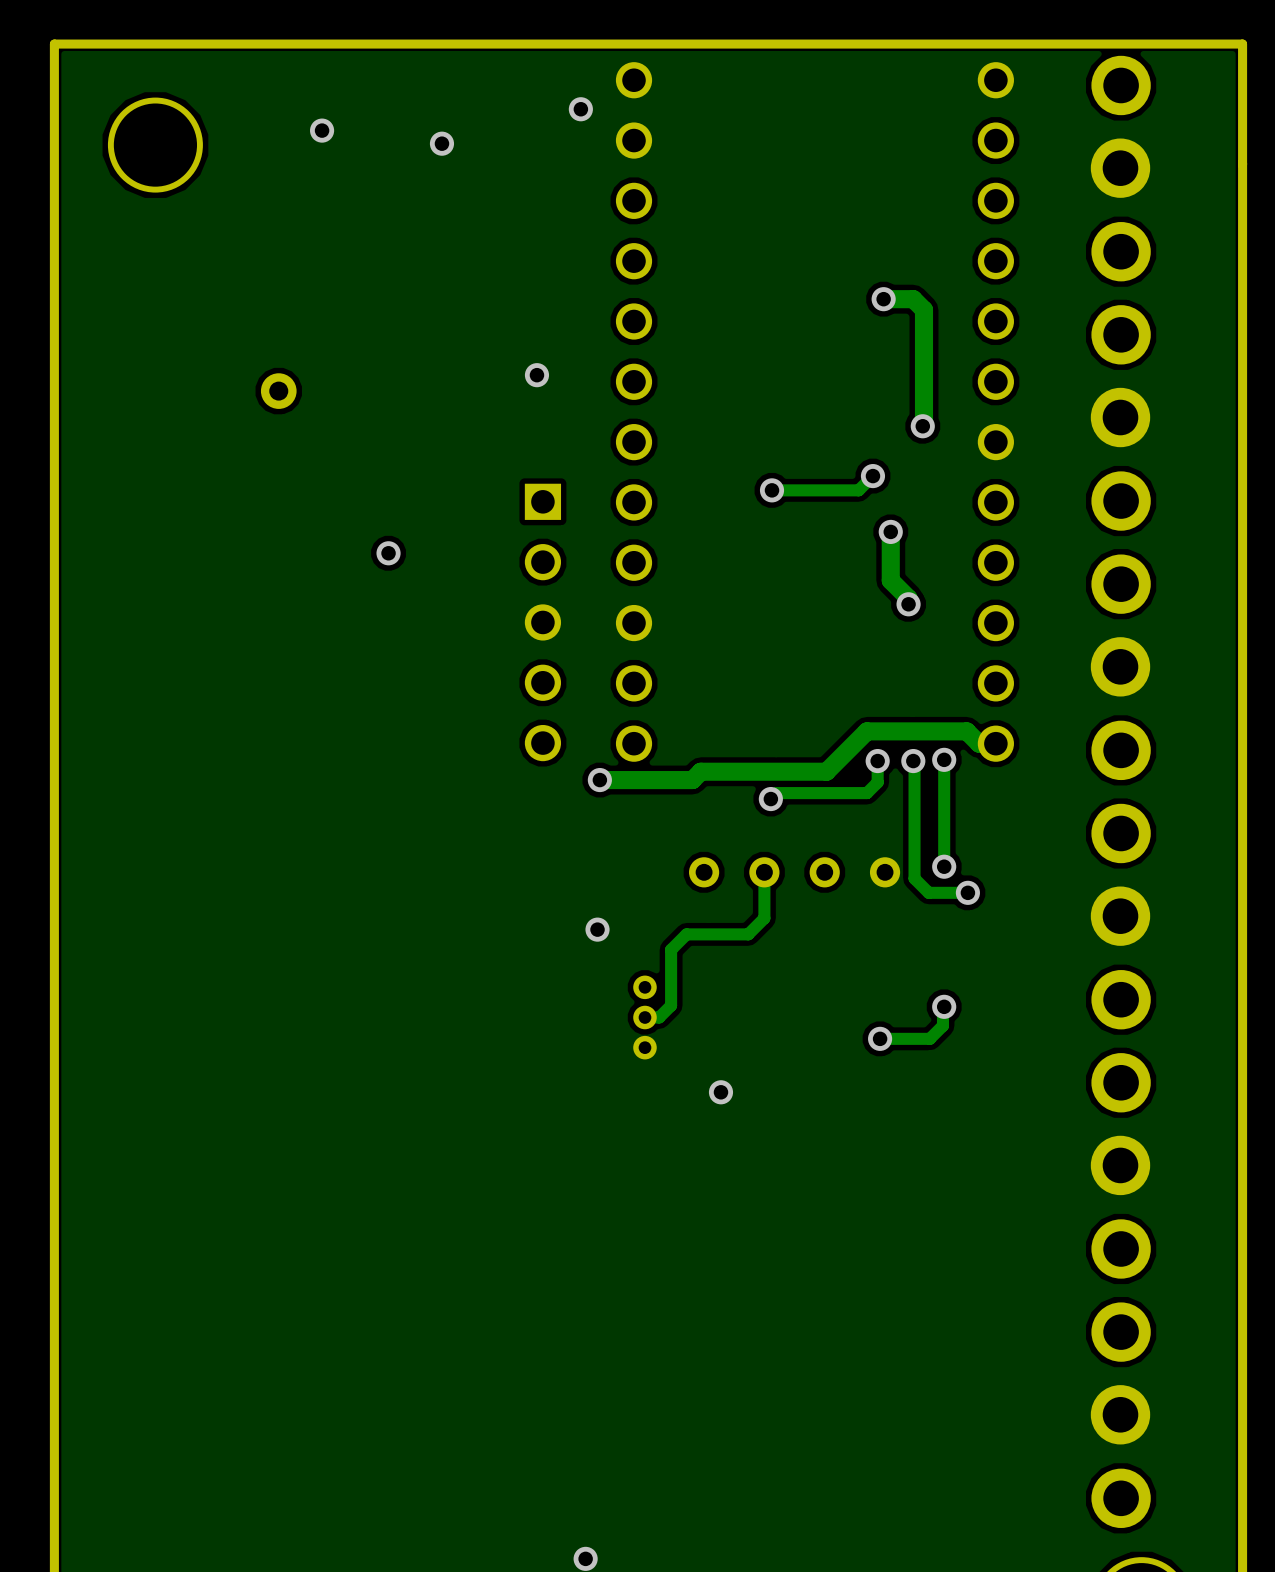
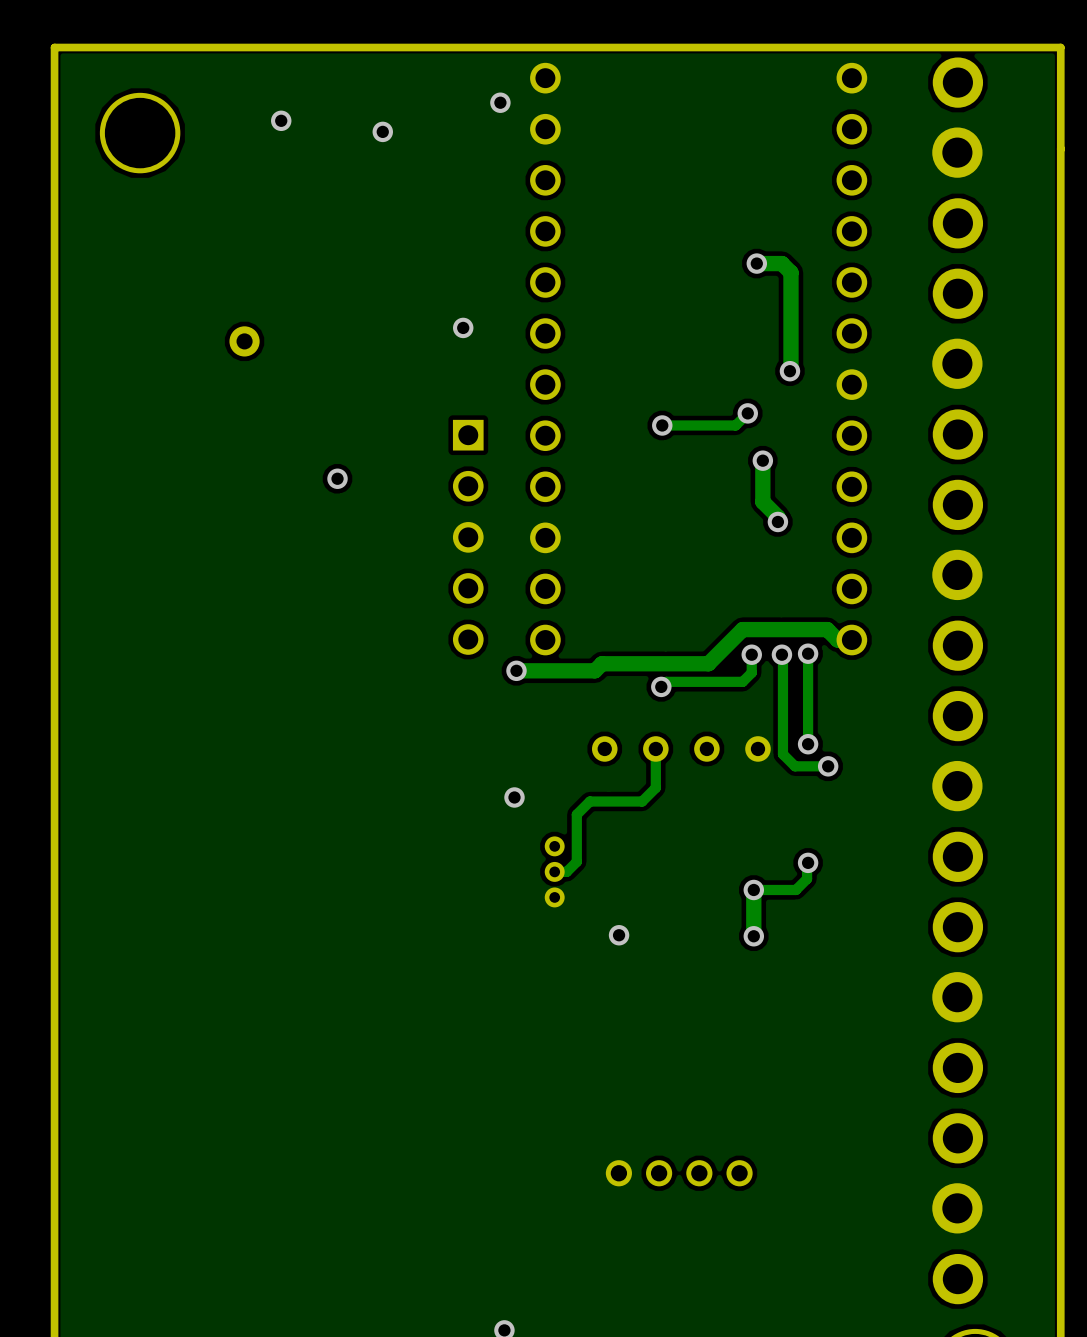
track: none -> (753, 889) (753, 936)
via: none -> (753, 936)
part: none -> (679, 1173)

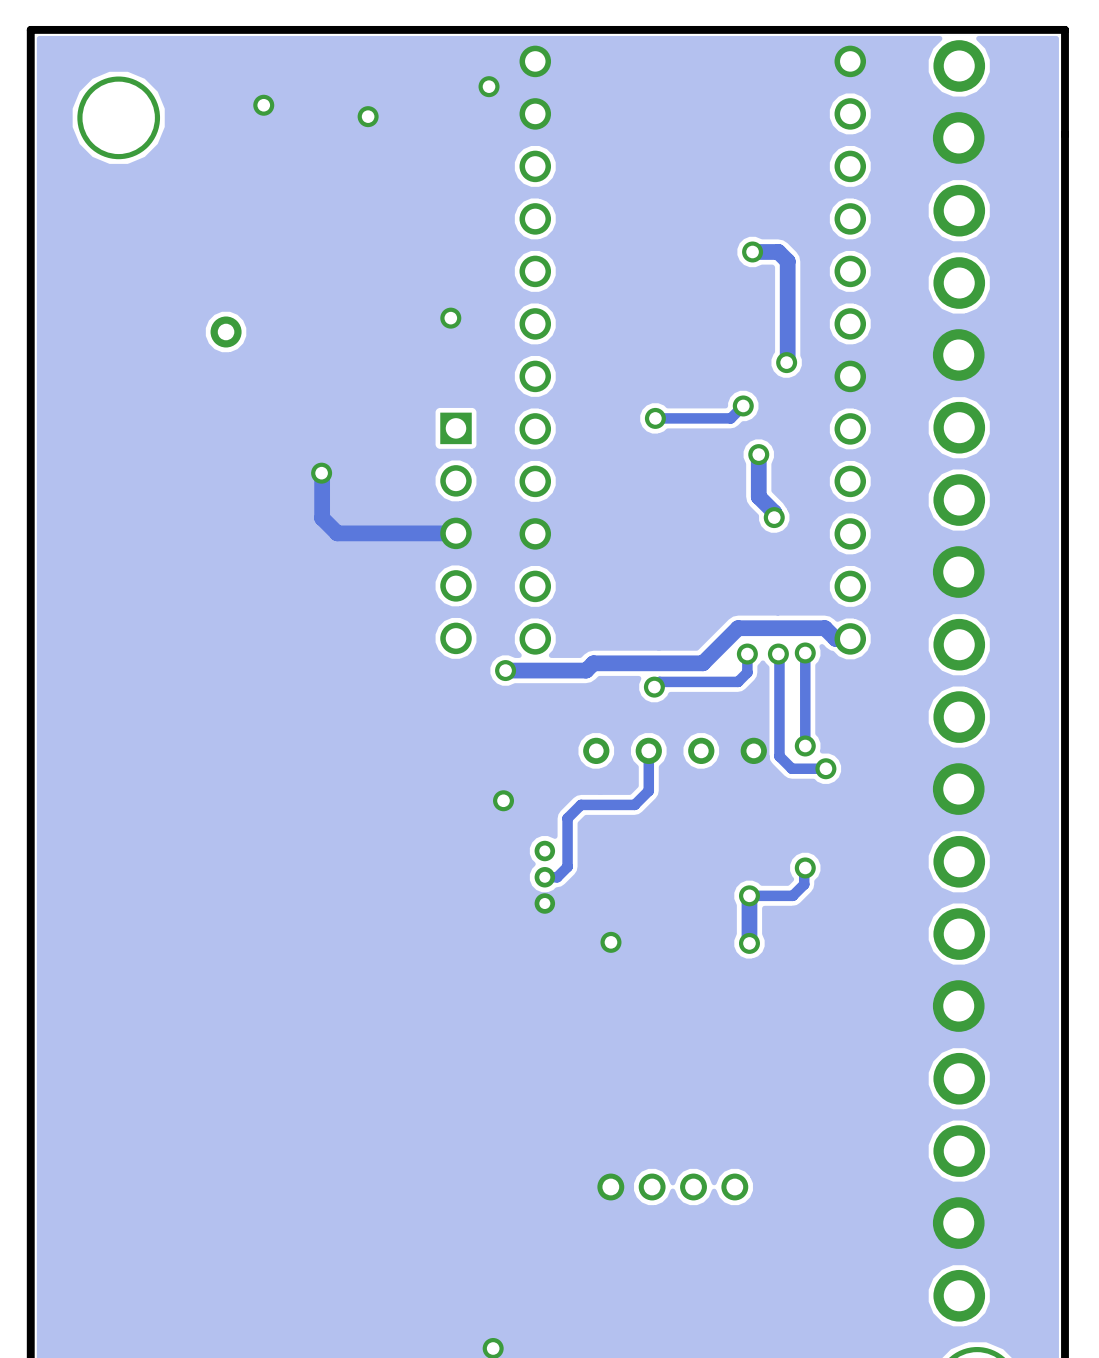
track: none -> (322, 472) (322, 518) (337, 533) (456, 533)

